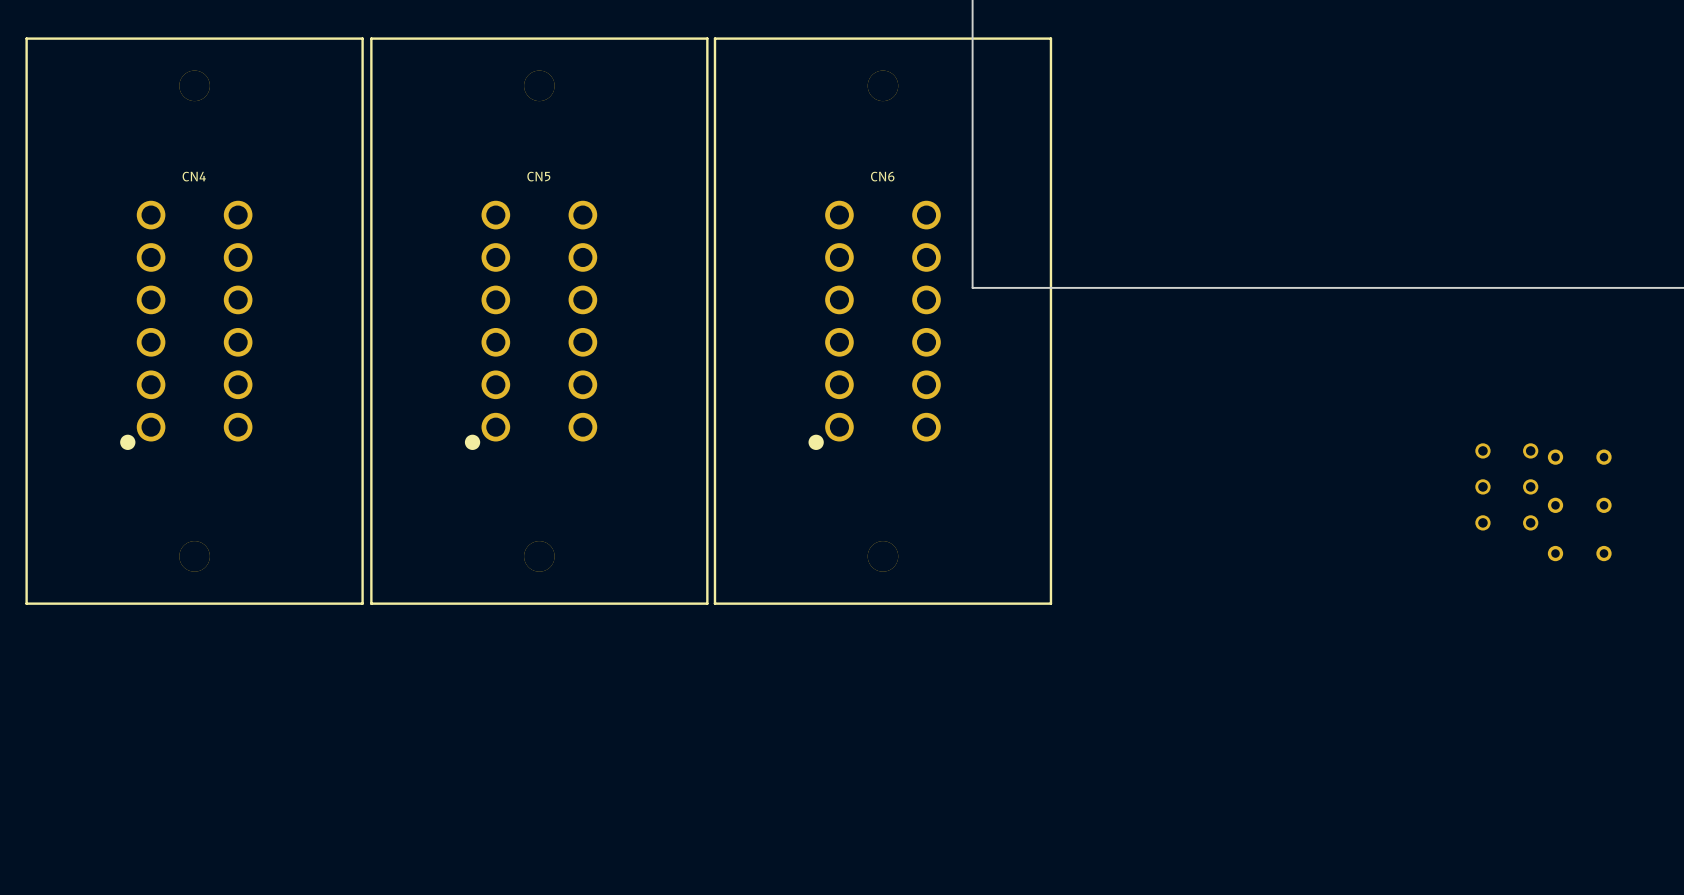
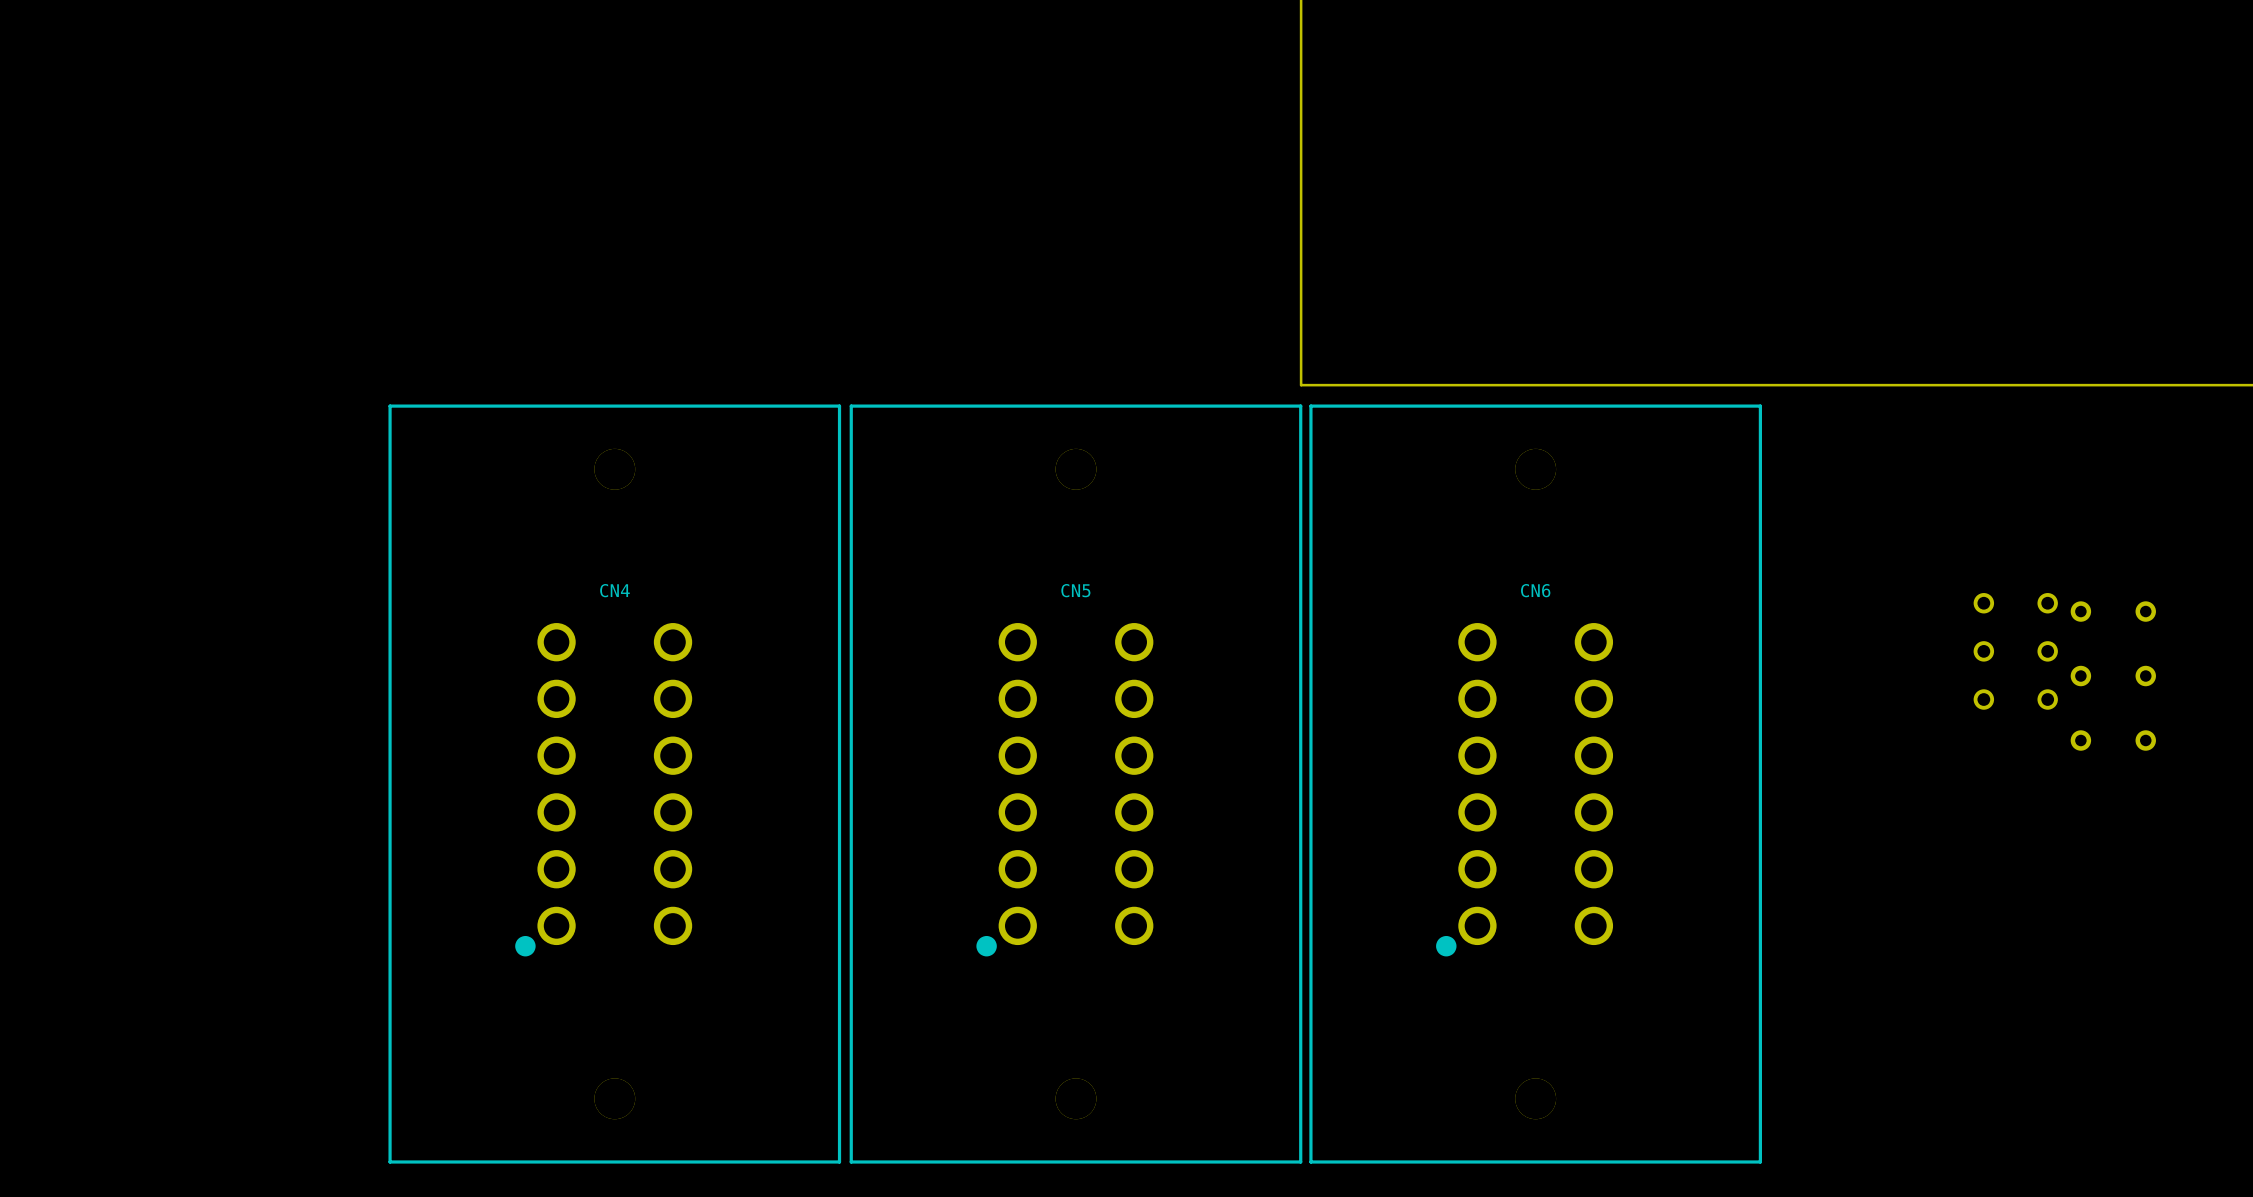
CN4 position: (194, 321) -> (614, 784)
CN5 position: (539, 321) -> (1075, 784)
CN6 position: (882, 321) -> (1535, 784)

